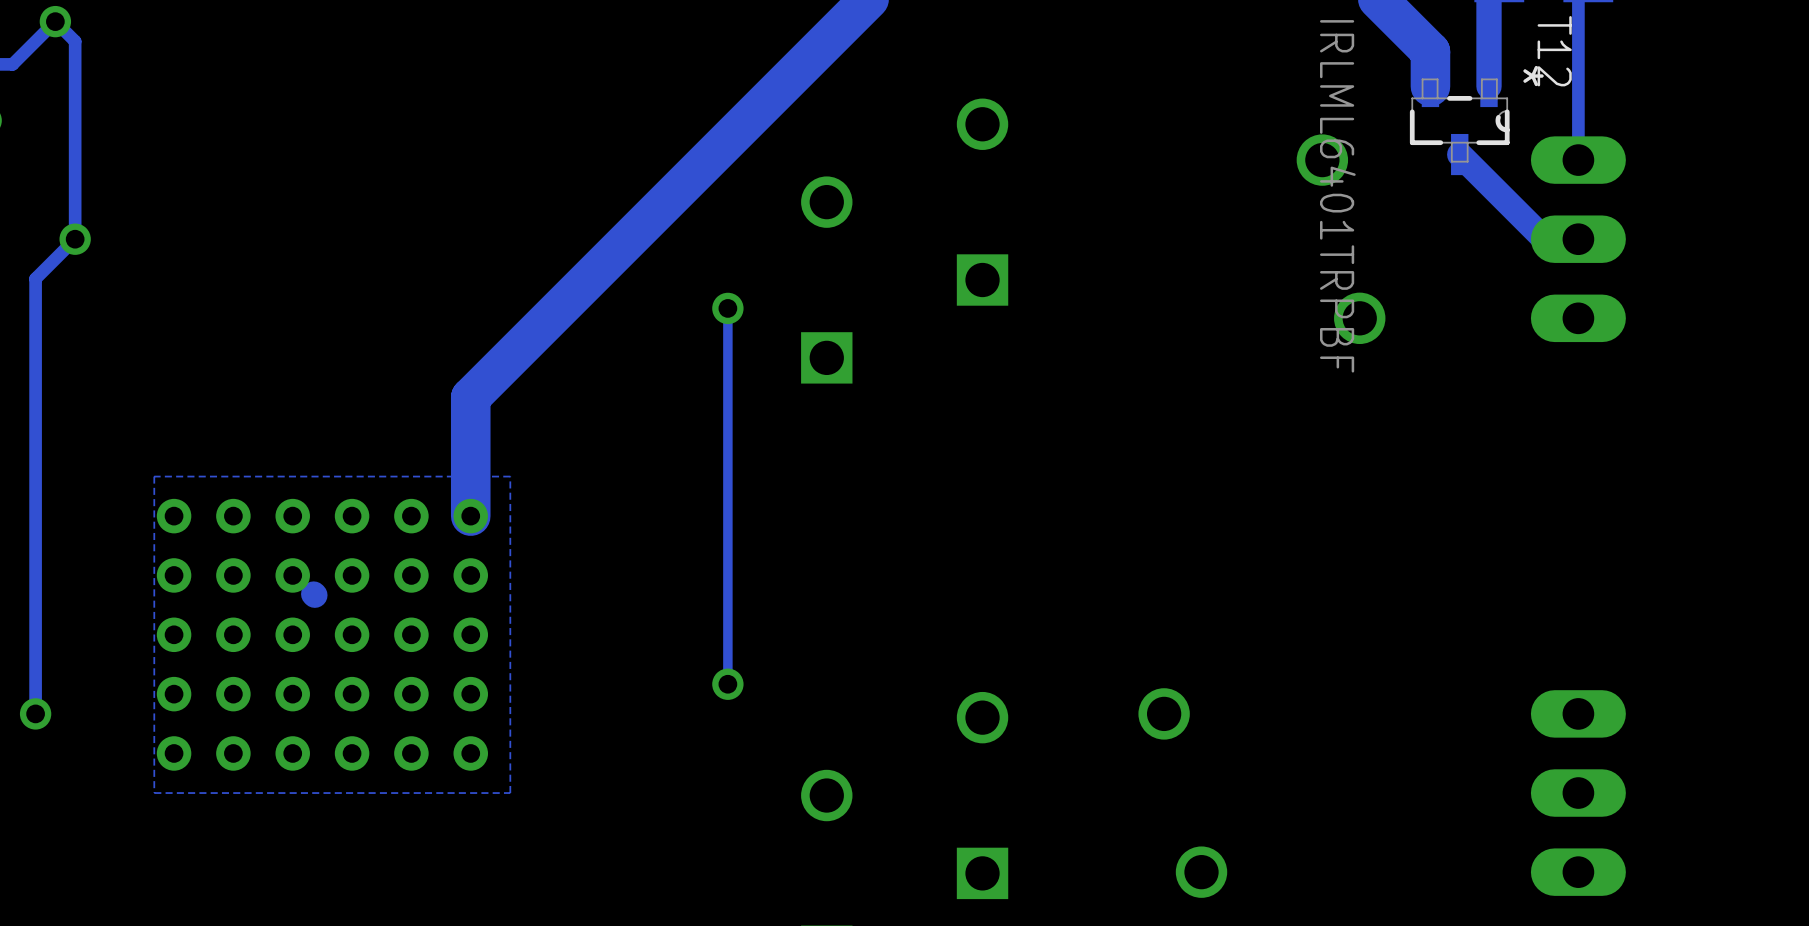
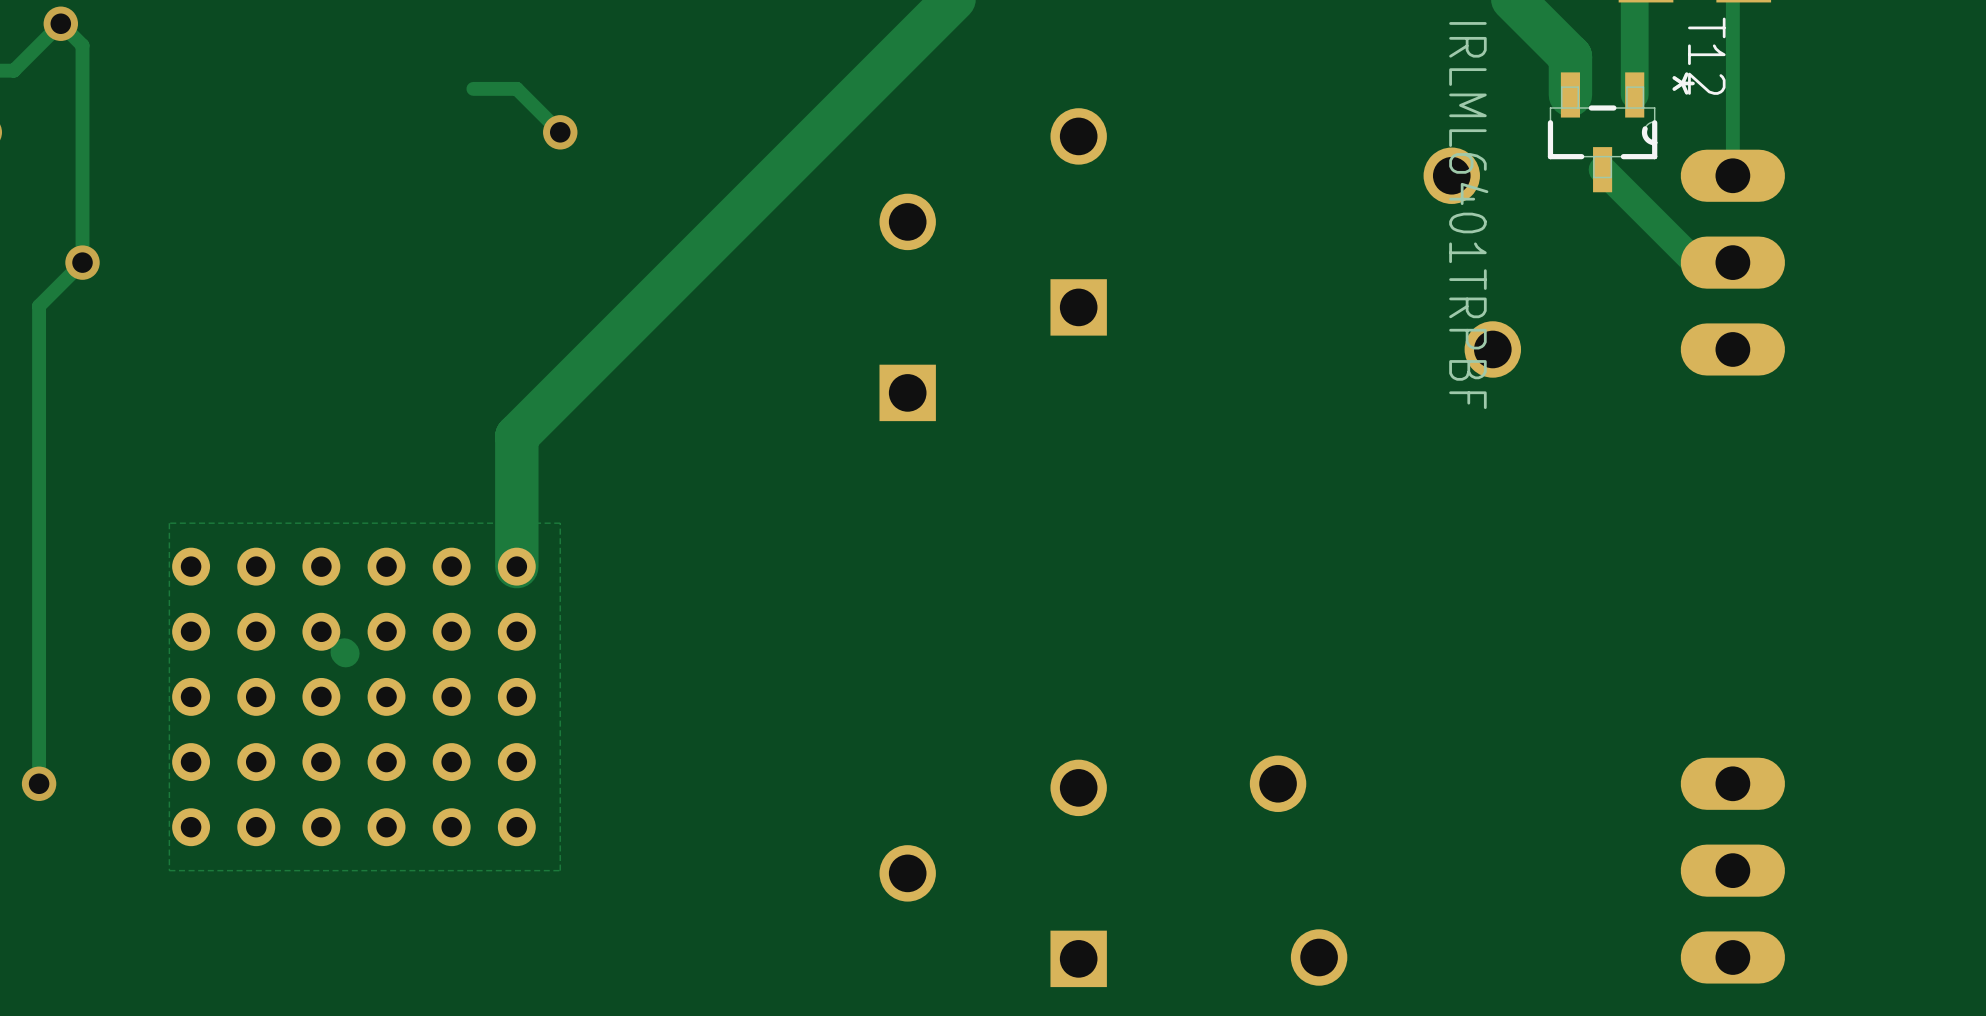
track: none -> (473, 88) (516, 88) (560, 132)
via: none -> (560, 132)
track: (727, 308) (727, 684) -> none
via: (727, 308) -> none
via: (727, 684) -> none

